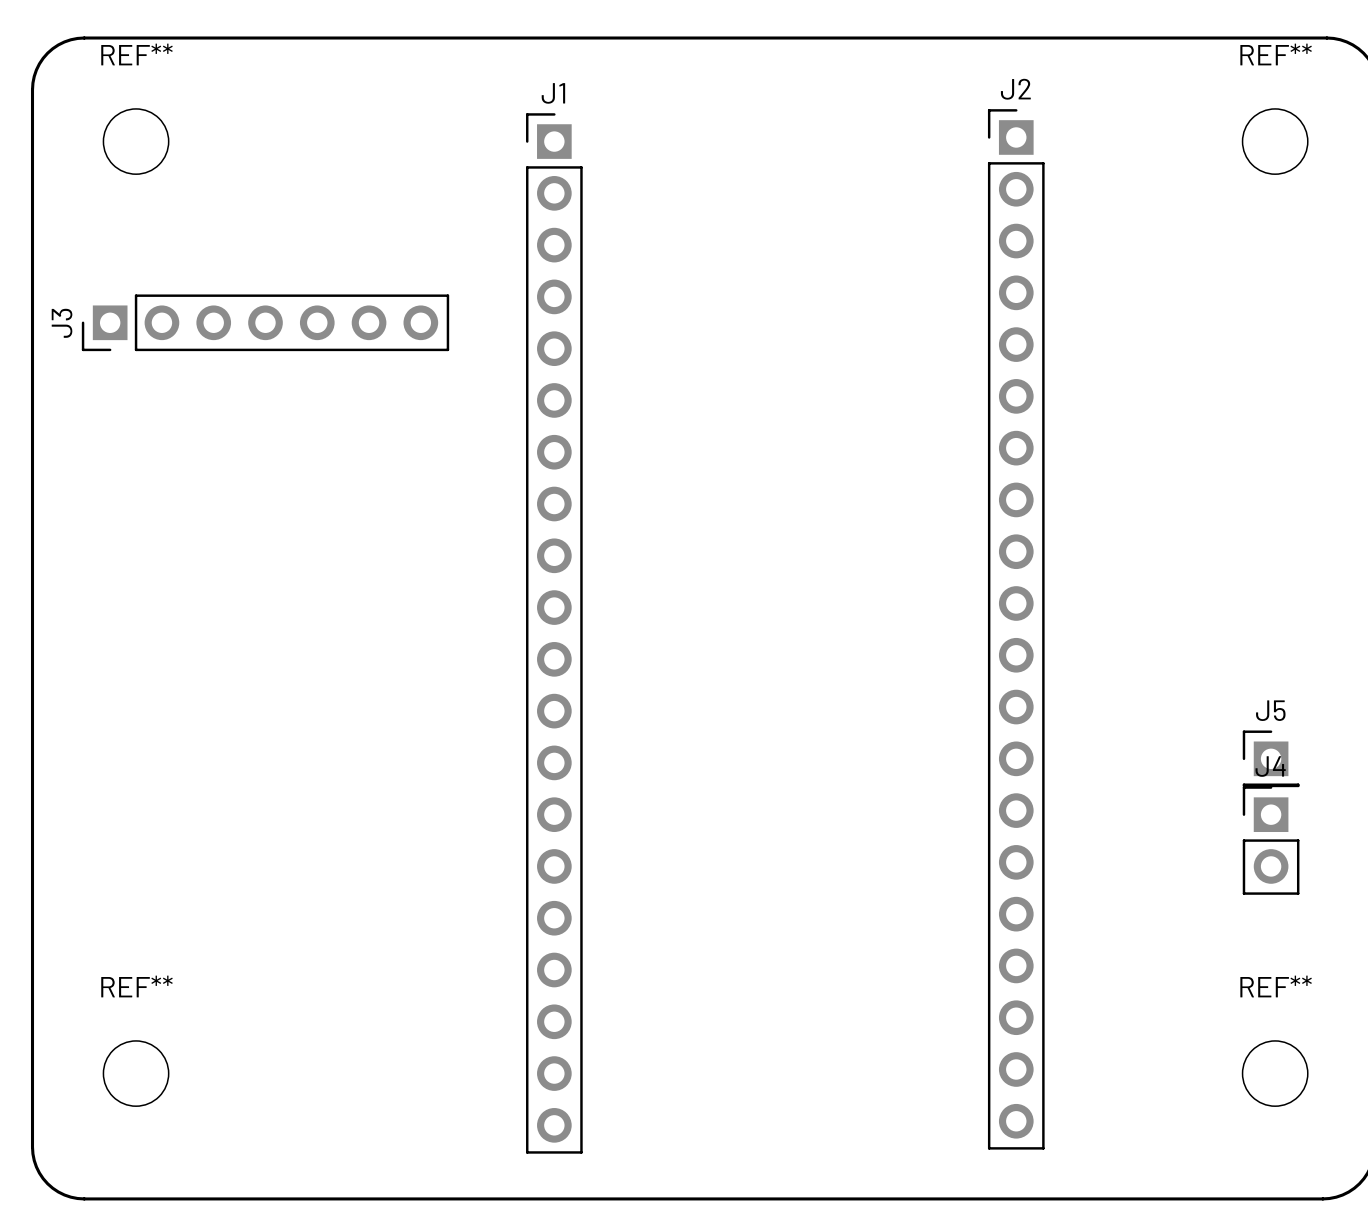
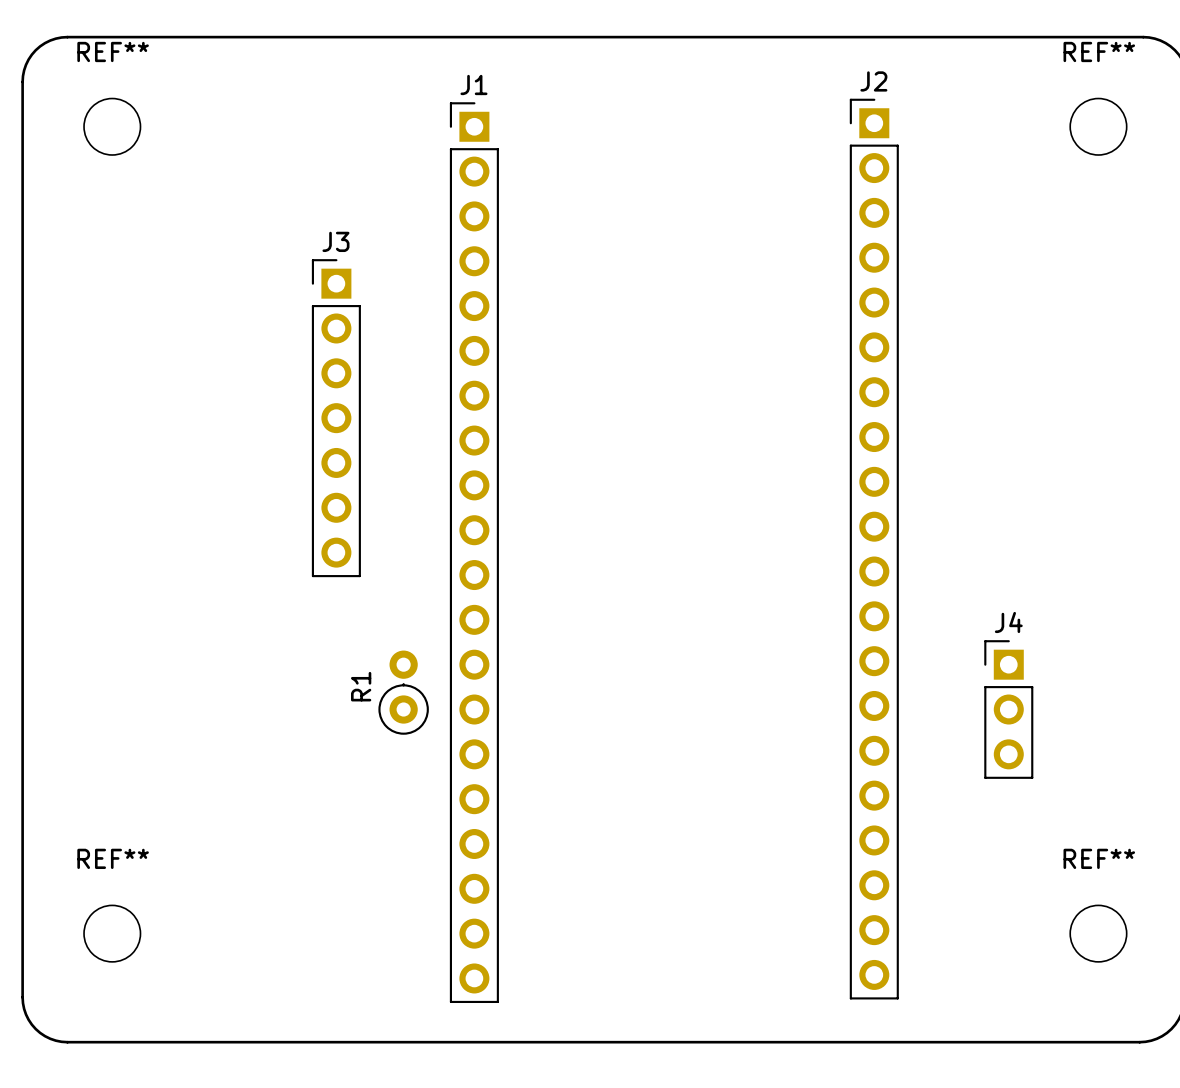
J3 rotation: 0° (265, 322) -> 90° clockwise (336, 418)
J5: (1271, 758) -> none
J4 footprint: [1242, 786, 1300, 895] -> [984, 640, 1034, 779]
R1: none -> (403, 692)

